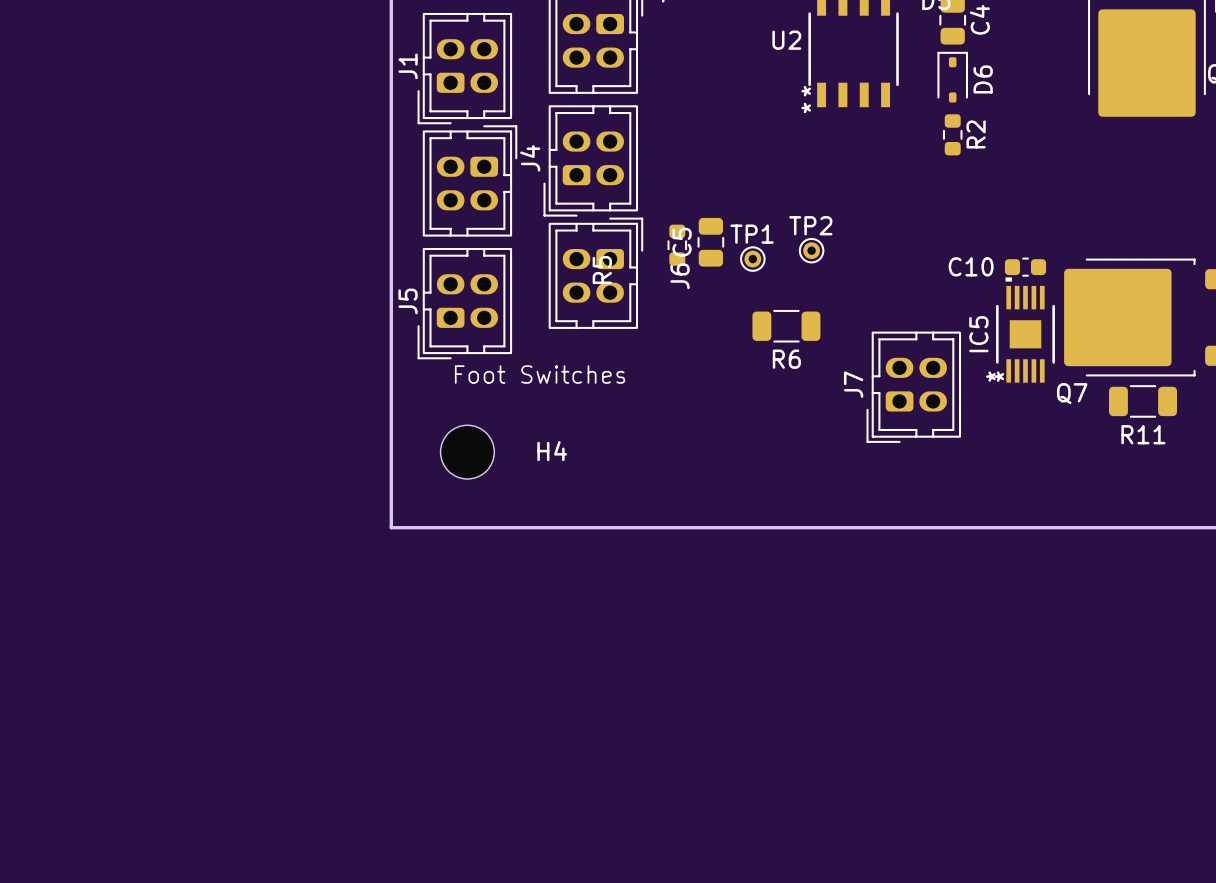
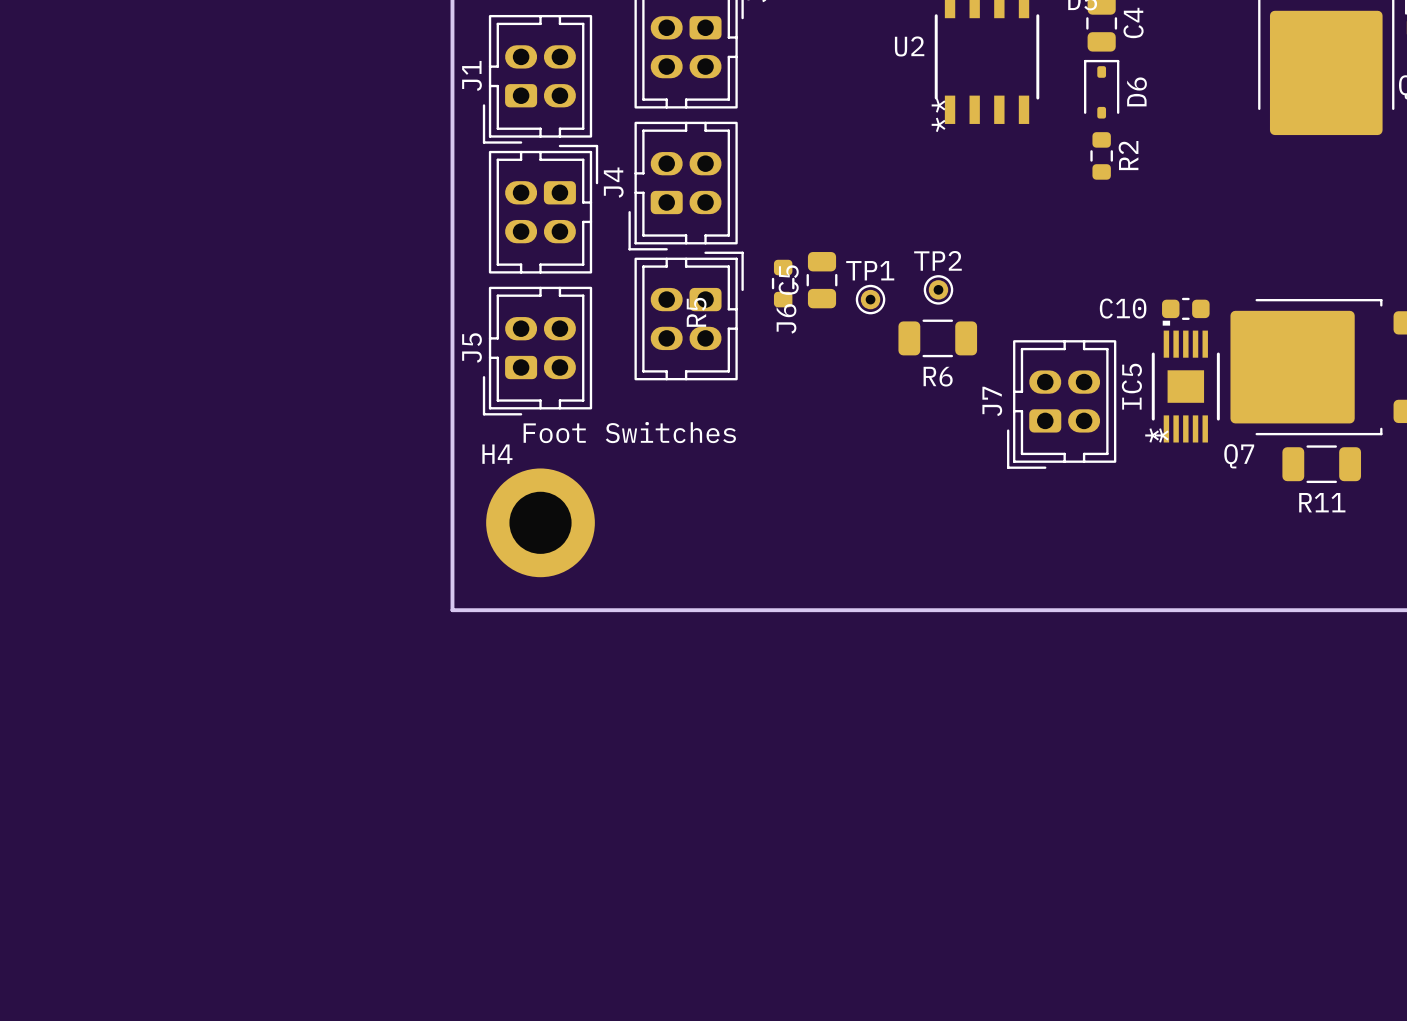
R6 position: (786, 326) -> (937, 338)
J7 position: (913, 387) -> (1061, 404)
H4 footprint: [440, 425, 495, 480] -> [486, 468, 595, 578]
H4 name position: H4 (552, 451) -> H4 (497, 454)

